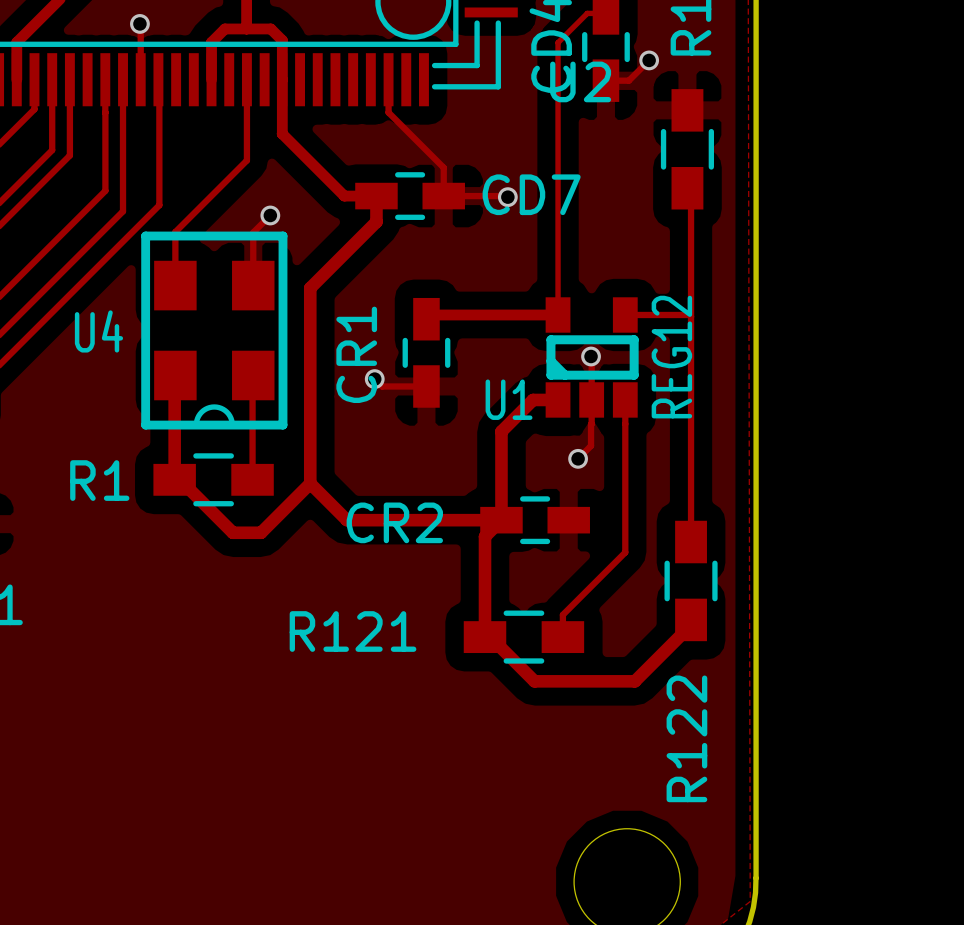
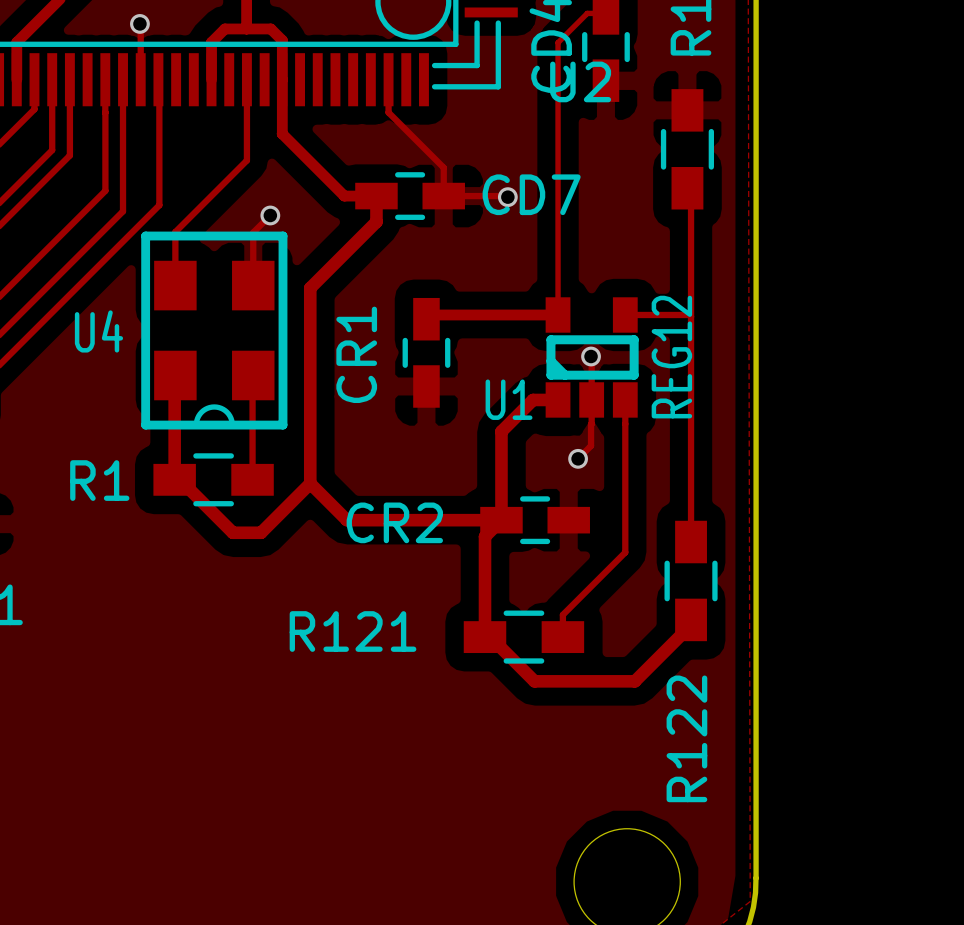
track: (649, 60) (628, 80) (605, 80) -> none
via: (649, 60) -> none
track: (374, 379) (382, 386) (426, 386) -> none
via: (374, 379) -> none

